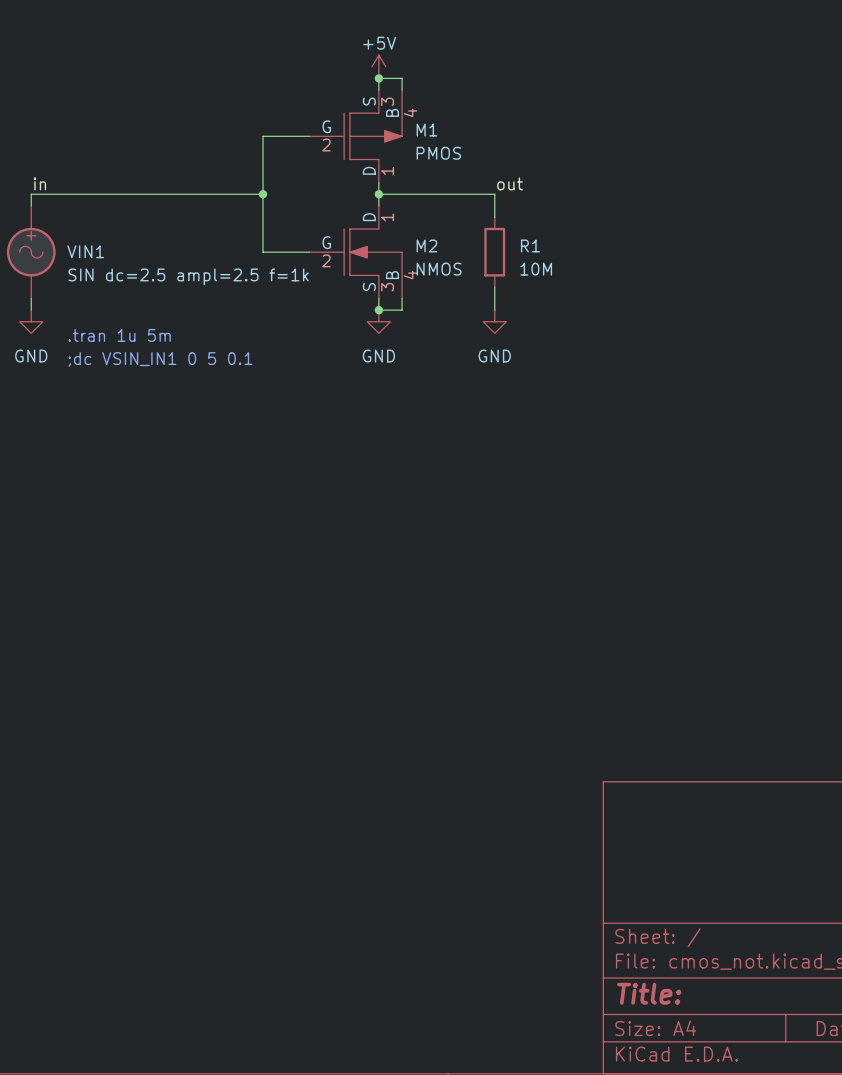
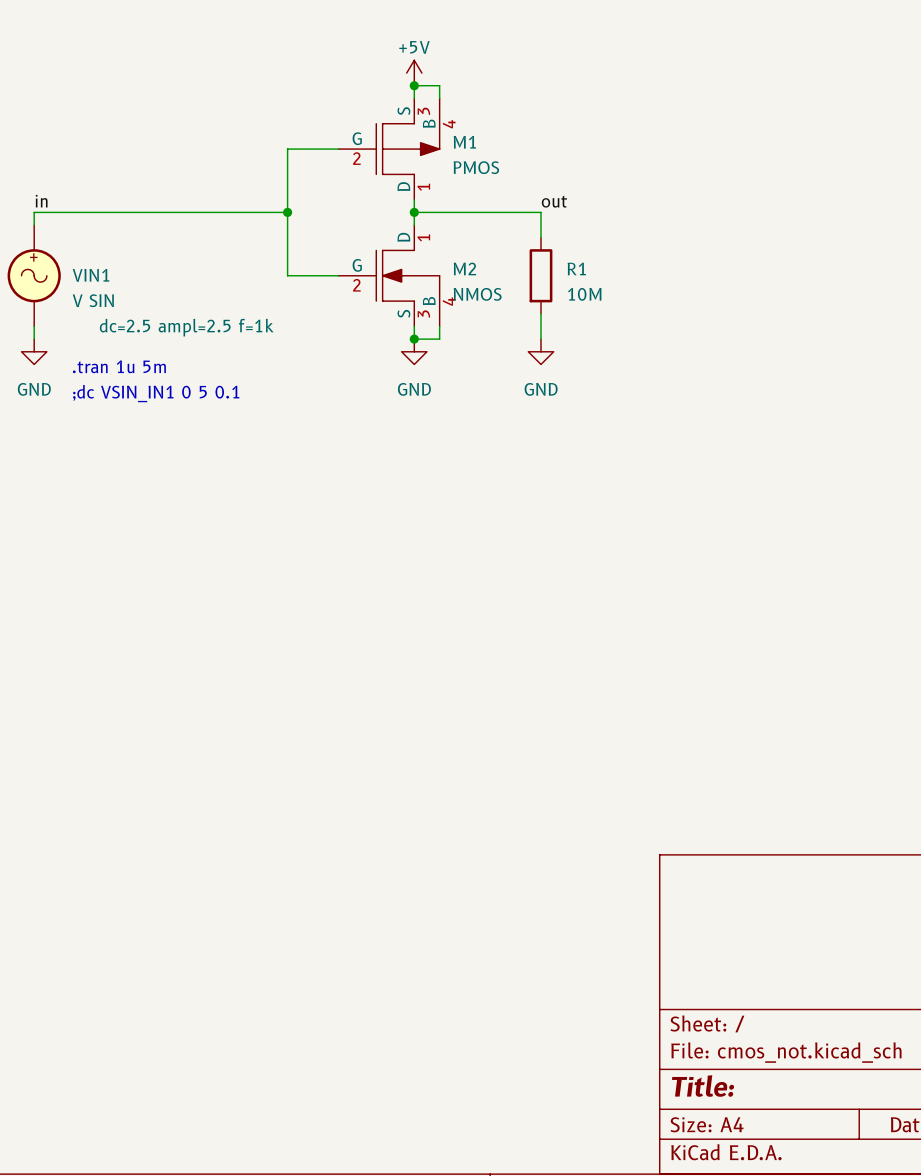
VIN1 value: SIN dc=2.5 ampl=2.5 f=1k (188, 276) -> V SIN (93, 300)
VIN1 text: none -> dc=2.5 ampl=2.5 f=1k (186, 327)

